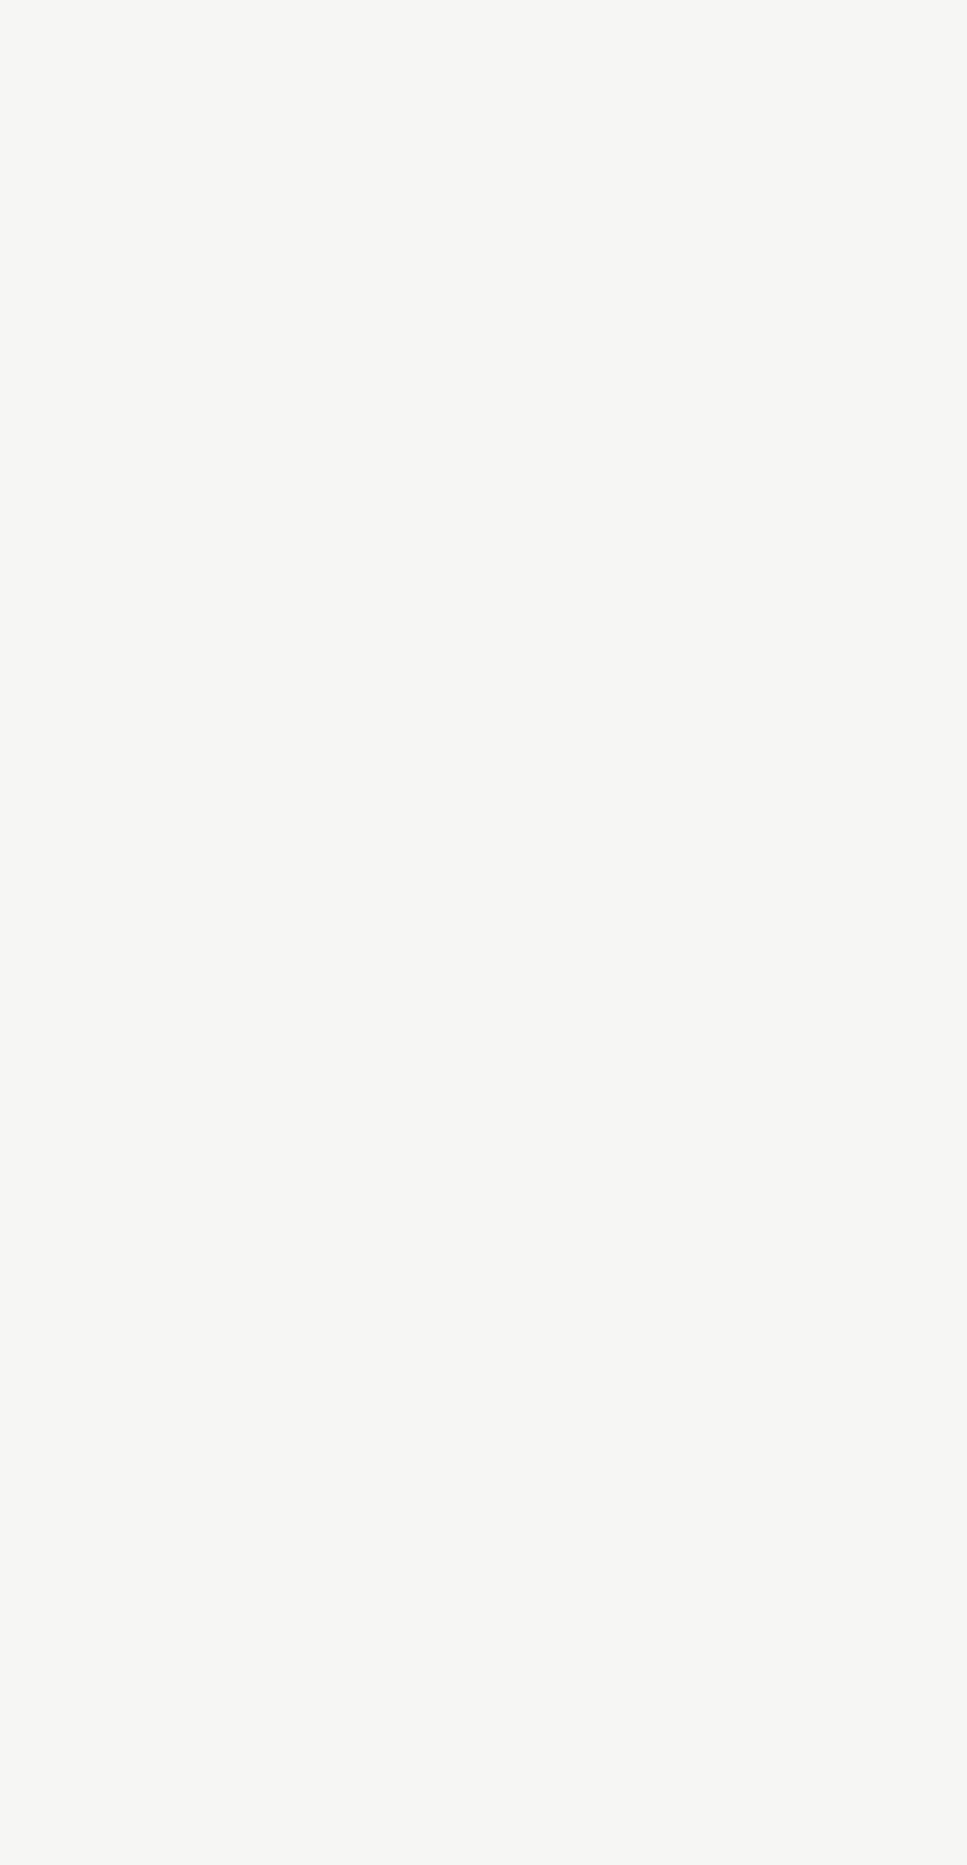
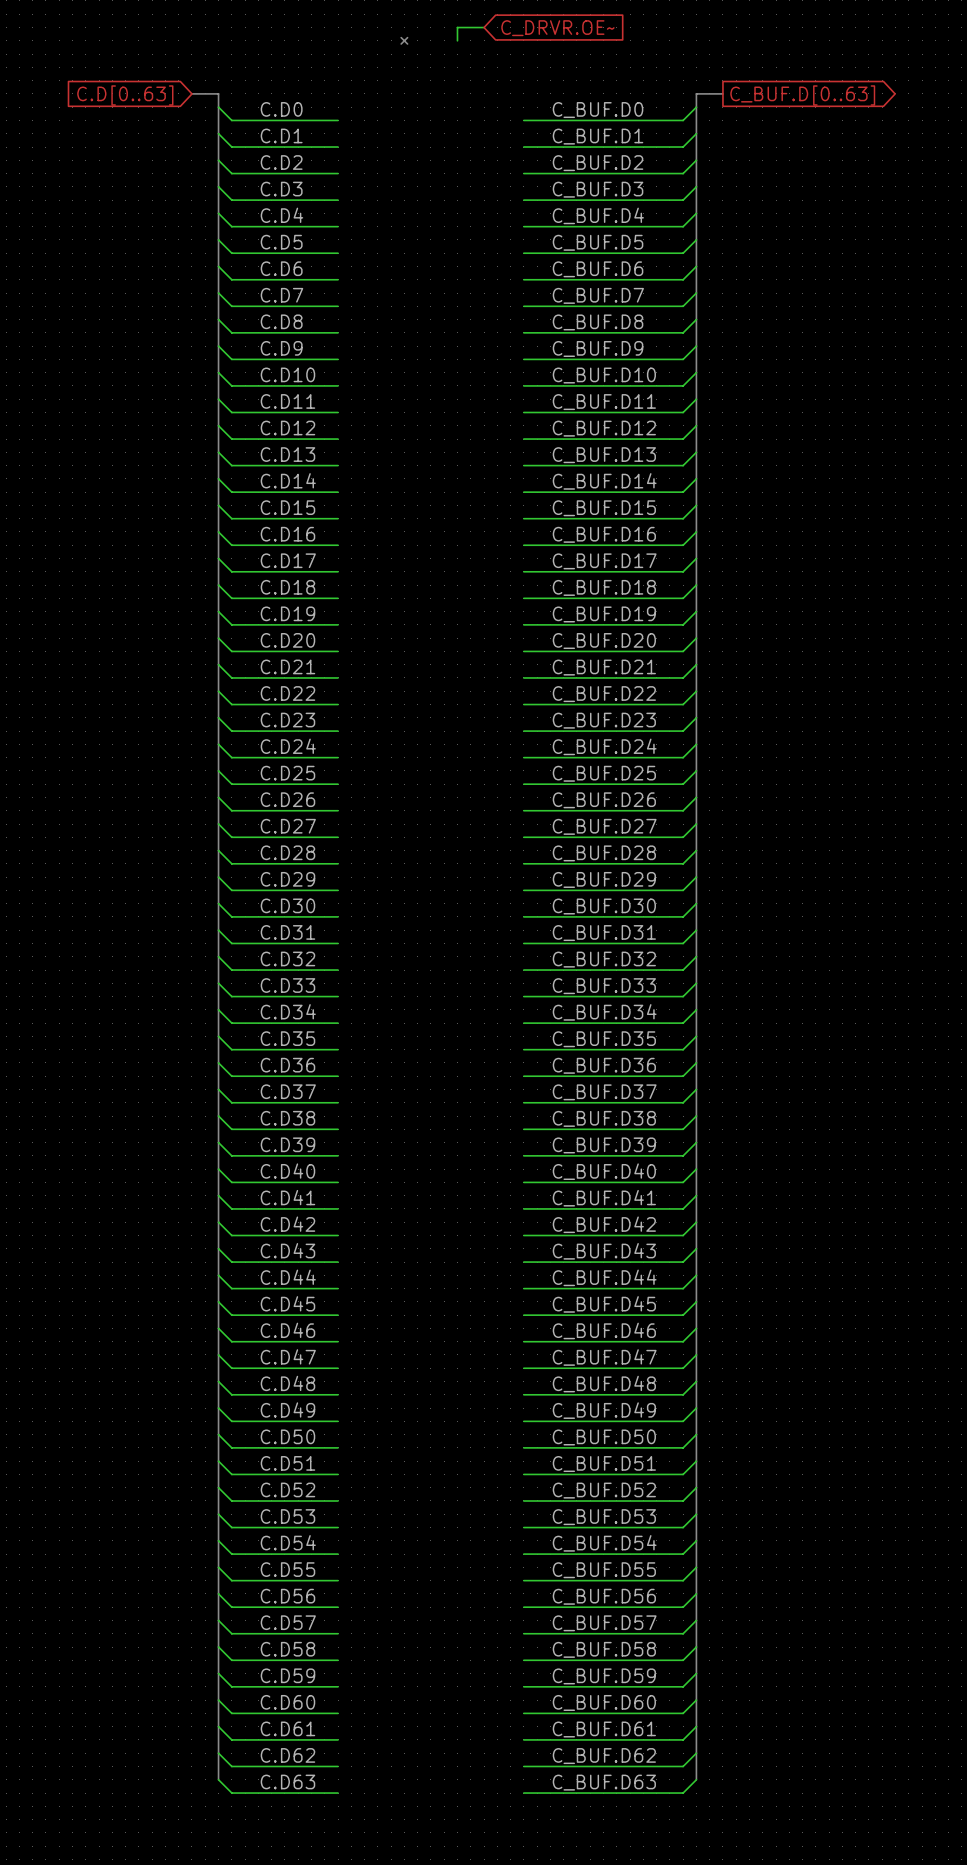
wire: none -> (484, 27) (457, 27) (457, 40)
global label: none -> C_DRVR.OE~ (557, 28)
no-connect mark: none -> (404, 40)
bus: none -> (191, 93) (218, 93) (218, 1779)
bus: none -> (722, 93) (696, 93) (696, 1779)
global label: none -> C.D[0..63] (125, 95)
global label: none -> C_BUF.D[0..63] (802, 95)
wire: none -> (218, 107) (231, 120) (338, 120)
wire: none -> (696, 107) (683, 120) (523, 120)
label: none -> C.D0 (281, 109)
label: none -> C_BUF.D0 (598, 110)
wire: none -> (218, 133) (231, 147) (338, 147)
wire: none -> (696, 133) (683, 147) (523, 147)
label: none -> C.D1 (281, 135)
label: none -> C_BUF.D1 (598, 136)
wire: none -> (218, 160) (231, 173) (338, 173)
wire: none -> (696, 160) (683, 173) (523, 173)
label: none -> C.D2 (281, 162)
label: none -> C_BUF.D2 (598, 163)
wire: none -> (218, 186) (231, 200) (338, 200)
wire: none -> (696, 186) (683, 200) (523, 200)
label: none -> C.D3 (281, 189)
label: none -> C_BUF.D3 (598, 189)
wire: none -> (218, 213) (231, 226) (338, 226)
wire: none -> (696, 213) (683, 226) (523, 226)
label: none -> C.D4 (281, 215)
label: none -> C_BUF.D4 (598, 215)
wire: none -> (218, 239) (231, 253) (338, 253)
wire: none -> (696, 239) (683, 253) (523, 253)
label: none -> C.D5 (281, 242)
label: none -> C_BUF.D5 (598, 242)
wire: none -> (218, 266) (231, 279) (338, 279)
wire: none -> (696, 266) (683, 279) (523, 279)
label: none -> C.D6 (281, 268)
label: none -> C_BUF.D6 (598, 269)
wire: none -> (218, 293) (231, 306) (338, 306)
wire: none -> (696, 293) (683, 306) (523, 306)
label: none -> C.D7 (281, 295)
label: none -> C_BUF.D7 (598, 295)
wire: none -> (218, 319) (231, 332) (338, 332)
wire: none -> (696, 319) (683, 332) (523, 332)
label: none -> C.D8 (281, 321)
label: none -> C_BUF.D8 (598, 322)
wire: none -> (218, 346) (231, 359) (338, 359)
wire: none -> (696, 346) (683, 359) (523, 359)
label: none -> C.D9 (281, 348)
label: none -> C_BUF.D9 (598, 348)
wire: none -> (218, 372) (231, 385) (338, 385)
wire: none -> (696, 372) (683, 385) (523, 385)
label: none -> C.D10 (287, 374)
label: none -> C_BUF.D10 (604, 375)
wire: none -> (218, 399) (231, 412) (338, 412)
wire: none -> (696, 399) (683, 412) (523, 412)
label: none -> C.D11 (287, 401)
label: none -> C_BUF.D11 (604, 402)
wire: none -> (218, 425) (231, 439) (338, 439)
wire: none -> (696, 425) (683, 439) (523, 439)
label: none -> C.D12 (287, 427)
label: none -> C_BUF.D12 (604, 428)
wire: none -> (218, 452) (231, 465) (338, 465)
wire: none -> (696, 452) (683, 465) (523, 465)
label: none -> C.D13 (287, 454)
label: none -> C_BUF.D13 (604, 455)
wire: none -> (218, 478) (231, 492) (338, 492)
wire: none -> (696, 478) (683, 492) (523, 492)
label: none -> C.D14 (288, 480)
label: none -> C_BUF.D14 (604, 481)
wire: none -> (218, 505) (231, 518) (338, 518)
wire: none -> (696, 505) (683, 518) (523, 518)
label: none -> C.D15 (287, 507)
label: none -> C_BUF.D15 (604, 508)
wire: none -> (218, 531) (231, 545) (338, 545)
wire: none -> (696, 531) (683, 545) (523, 545)
label: none -> C.D16 (287, 534)
label: none -> C_BUF.D16 (604, 534)
wire: none -> (218, 558) (231, 571) (338, 571)
wire: none -> (696, 558) (683, 571) (523, 571)
label: none -> C.D17 (288, 560)
label: none -> C_BUF.D17 (604, 561)
wire: none -> (218, 585) (231, 598) (338, 598)
wire: none -> (696, 585) (683, 598) (523, 598)
label: none -> C.D18 (287, 587)
label: none -> C_BUF.D18 (604, 587)
wire: none -> (218, 611) (231, 624) (338, 624)
wire: none -> (696, 611) (683, 624) (523, 624)
label: none -> C.D19 (287, 613)
label: none -> C_BUF.D19 (604, 614)
wire: none -> (218, 638) (231, 651) (338, 651)
wire: none -> (696, 638) (683, 651) (523, 651)
label: none -> C.D20 (287, 640)
label: none -> C_BUF.D20 (604, 641)
wire: none -> (218, 664) (231, 677) (338, 677)
wire: none -> (696, 664) (683, 677) (523, 677)
label: none -> C.D21 (287, 666)
label: none -> C_BUF.D21 (604, 667)
wire: none -> (218, 691) (231, 704) (338, 704)
wire: none -> (696, 691) (683, 704) (523, 704)
label: none -> C.D22 (287, 693)
label: none -> C_BUF.D22 (604, 694)
wire: none -> (218, 717) (231, 731) (338, 731)
wire: none -> (696, 717) (683, 731) (523, 731)
label: none -> C.D23 (287, 720)
label: none -> C_BUF.D23 (604, 720)
wire: none -> (218, 744) (231, 757) (338, 757)
wire: none -> (696, 744) (683, 757) (523, 757)
label: none -> C.D24 (288, 746)
label: none -> C_BUF.D24 (604, 746)
wire: none -> (218, 770) (231, 784) (338, 784)
wire: none -> (696, 770) (683, 784) (523, 784)
label: none -> C.D25 (287, 773)
label: none -> C_BUF.D25 (604, 773)
wire: none -> (218, 797) (231, 810) (338, 810)
wire: none -> (696, 797) (683, 810) (523, 810)
label: none -> C.D26 (287, 799)
label: none -> C_BUF.D26 (604, 800)
wire: none -> (218, 824) (231, 837) (338, 837)
wire: none -> (696, 824) (683, 837) (523, 837)
label: none -> C.D27 (288, 826)
label: none -> C_BUF.D27 (604, 826)
wire: none -> (218, 850) (231, 863) (338, 863)
wire: none -> (696, 850) (683, 863) (523, 863)
label: none -> C.D28 (287, 852)
label: none -> C_BUF.D28 (604, 853)
wire: none -> (218, 877) (231, 890) (338, 890)
wire: none -> (696, 877) (683, 890) (523, 890)
label: none -> C.D29 (287, 879)
label: none -> C_BUF.D29 (604, 879)
wire: none -> (218, 903) (231, 916) (338, 916)
wire: none -> (696, 903) (683, 916) (523, 916)
label: none -> C.D30 (287, 905)
label: none -> C_BUF.D30 (604, 906)
wire: none -> (218, 930) (231, 943) (338, 943)
wire: none -> (696, 930) (683, 943) (523, 943)
label: none -> C.D31 (287, 932)
label: none -> C_BUF.D31 (604, 933)
wire: none -> (218, 956) (231, 970) (338, 970)
wire: none -> (696, 956) (683, 970) (523, 970)
label: none -> C.D32 (287, 958)
label: none -> C_BUF.D32 (604, 959)
wire: none -> (218, 983) (231, 996) (338, 996)
wire: none -> (696, 983) (683, 996) (523, 996)
label: none -> C.D33 (287, 985)
label: none -> C_BUF.D33 (604, 986)
wire: none -> (218, 1009) (231, 1023) (338, 1023)
wire: none -> (696, 1009) (683, 1023) (523, 1023)
label: none -> C.D34 (288, 1011)
label: none -> C_BUF.D34 (604, 1012)
wire: none -> (218, 1036) (231, 1049) (338, 1049)
wire: none -> (696, 1036) (683, 1049) (523, 1049)
label: none -> C.D35 (287, 1038)
label: none -> C_BUF.D35 (604, 1039)
wire: none -> (218, 1062) (231, 1076) (338, 1076)
wire: none -> (696, 1062) (683, 1076) (523, 1076)
label: none -> C.D36 (287, 1065)
label: none -> C_BUF.D36 (604, 1065)
wire: none -> (218, 1089) (231, 1102) (338, 1102)
wire: none -> (696, 1089) (683, 1102) (523, 1102)
label: none -> C.D37 (288, 1091)
label: none -> C_BUF.D37 (604, 1092)
wire: none -> (218, 1116) (231, 1129) (338, 1129)
wire: none -> (696, 1116) (683, 1129) (523, 1129)
label: none -> C.D38 (287, 1118)
label: none -> C_BUF.D38 (604, 1118)
wire: none -> (218, 1142) (231, 1155) (338, 1155)
wire: none -> (696, 1142) (683, 1155) (523, 1155)
label: none -> C.D39 (287, 1144)
label: none -> C_BUF.D39 (604, 1145)
wire: none -> (218, 1169) (231, 1182) (338, 1182)
wire: none -> (696, 1169) (683, 1182) (523, 1182)
label: none -> C.D40 (287, 1171)
label: none -> C_BUF.D40 (604, 1171)
wire: none -> (218, 1195) (231, 1208) (338, 1208)
wire: none -> (696, 1195) (683, 1208) (523, 1208)
label: none -> C.D41 (287, 1197)
label: none -> C_BUF.D41 (604, 1198)
wire: none -> (218, 1222) (231, 1235) (338, 1235)
wire: none -> (696, 1222) (683, 1235) (523, 1235)
label: none -> C.D42 (287, 1224)
label: none -> C_BUF.D42 (604, 1224)
wire: none -> (218, 1248) (231, 1262) (338, 1262)
wire: none -> (696, 1248) (683, 1262) (523, 1262)
label: none -> C.D43 (287, 1250)
label: none -> C_BUF.D43 (604, 1251)
wire: none -> (218, 1275) (231, 1288) (338, 1288)
wire: none -> (696, 1275) (683, 1288) (523, 1288)
label: none -> C.D44 (288, 1277)
label: none -> C_BUF.D44 (604, 1277)
wire: none -> (218, 1301) (231, 1315) (338, 1315)
wire: none -> (696, 1301) (683, 1315) (523, 1315)
label: none -> C.D45 (287, 1303)
label: none -> C_BUF.D45 (604, 1304)
wire: none -> (218, 1328) (231, 1341) (338, 1341)
wire: none -> (696, 1328) (683, 1341) (523, 1341)
label: none -> C.D46 (287, 1330)
label: none -> C_BUF.D46 (604, 1330)
wire: none -> (218, 1354) (231, 1368) (338, 1368)
wire: none -> (696, 1354) (683, 1368) (523, 1368)
label: none -> C.D47 (288, 1356)
label: none -> C_BUF.D47 (604, 1357)
wire: none -> (218, 1381) (231, 1394) (338, 1394)
wire: none -> (696, 1381) (683, 1394) (523, 1394)
label: none -> C.D48 (287, 1383)
label: none -> C_BUF.D48 (604, 1384)
wire: none -> (218, 1408) (231, 1421) (338, 1421)
wire: none -> (696, 1408) (683, 1421) (523, 1421)
label: none -> C.D49 (287, 1409)
label: none -> C_BUF.D49 (604, 1410)
wire: none -> (218, 1434) (231, 1447) (338, 1447)
wire: none -> (696, 1434) (683, 1447) (523, 1447)
label: none -> C.D50 (287, 1436)
label: none -> C_BUF.D50 (604, 1437)
wire: none -> (218, 1461) (231, 1474) (338, 1474)
wire: none -> (696, 1461) (683, 1474) (523, 1474)
label: none -> C.D51 (287, 1463)
label: none -> C_BUF.D51 (604, 1464)
wire: none -> (218, 1487) (231, 1500) (338, 1500)
wire: none -> (696, 1487) (683, 1500) (523, 1500)
label: none -> C.D52 (287, 1489)
label: none -> C_BUF.D52 (604, 1490)
wire: none -> (218, 1514) (231, 1527) (338, 1527)
wire: none -> (696, 1514) (683, 1527) (523, 1527)
label: none -> C.D53 (287, 1516)
label: none -> C_BUF.D53 (604, 1517)
wire: none -> (218, 1540) (231, 1554) (338, 1554)
wire: none -> (696, 1540) (683, 1554) (523, 1554)
label: none -> C.D54 (288, 1542)
label: none -> C_BUF.D54 (604, 1543)
wire: none -> (218, 1567) (231, 1580) (338, 1580)
wire: none -> (696, 1567) (683, 1580) (523, 1580)
label: none -> C.D55 (287, 1569)
label: none -> C_BUF.D55 (604, 1570)
wire: none -> (218, 1593) (231, 1607) (338, 1607)
wire: none -> (696, 1593) (683, 1607) (523, 1607)
label: none -> C.D56 (287, 1596)
label: none -> C_BUF.D56 (604, 1596)
wire: none -> (218, 1620) (231, 1633) (338, 1633)
wire: none -> (696, 1620) (683, 1633) (523, 1633)
label: none -> C.D57 (288, 1622)
label: none -> C_BUF.D57 (604, 1623)
wire: none -> (218, 1647) (231, 1660) (338, 1660)
wire: none -> (696, 1647) (683, 1660) (523, 1660)
label: none -> C.D58 (287, 1649)
label: none -> C_BUF.D58 (604, 1649)
wire: none -> (218, 1673) (231, 1686) (338, 1686)
wire: none -> (696, 1673) (683, 1686) (523, 1686)
label: none -> C.D59 (287, 1675)
label: none -> C_BUF.D59 (604, 1676)
wire: none -> (218, 1700) (231, 1713) (338, 1713)
wire: none -> (696, 1700) (683, 1713) (523, 1713)
label: none -> C.D60 (287, 1702)
label: none -> C_BUF.D60 (604, 1702)
wire: none -> (218, 1726) (231, 1739) (338, 1739)
wire: none -> (696, 1726) (683, 1739) (523, 1739)
label: none -> C.D61 (287, 1728)
label: none -> C_BUF.D61 (604, 1729)
wire: none -> (218, 1753) (231, 1766) (338, 1766)
wire: none -> (696, 1753) (683, 1766) (523, 1766)
label: none -> C.D62 (287, 1755)
label: none -> C_BUF.D62 (604, 1756)
wire: none -> (218, 1779) (231, 1793) (338, 1793)
wire: none -> (696, 1779) (683, 1793) (523, 1793)
label: none -> C.D63 (287, 1781)
label: none -> C_BUF.D63 (604, 1782)

